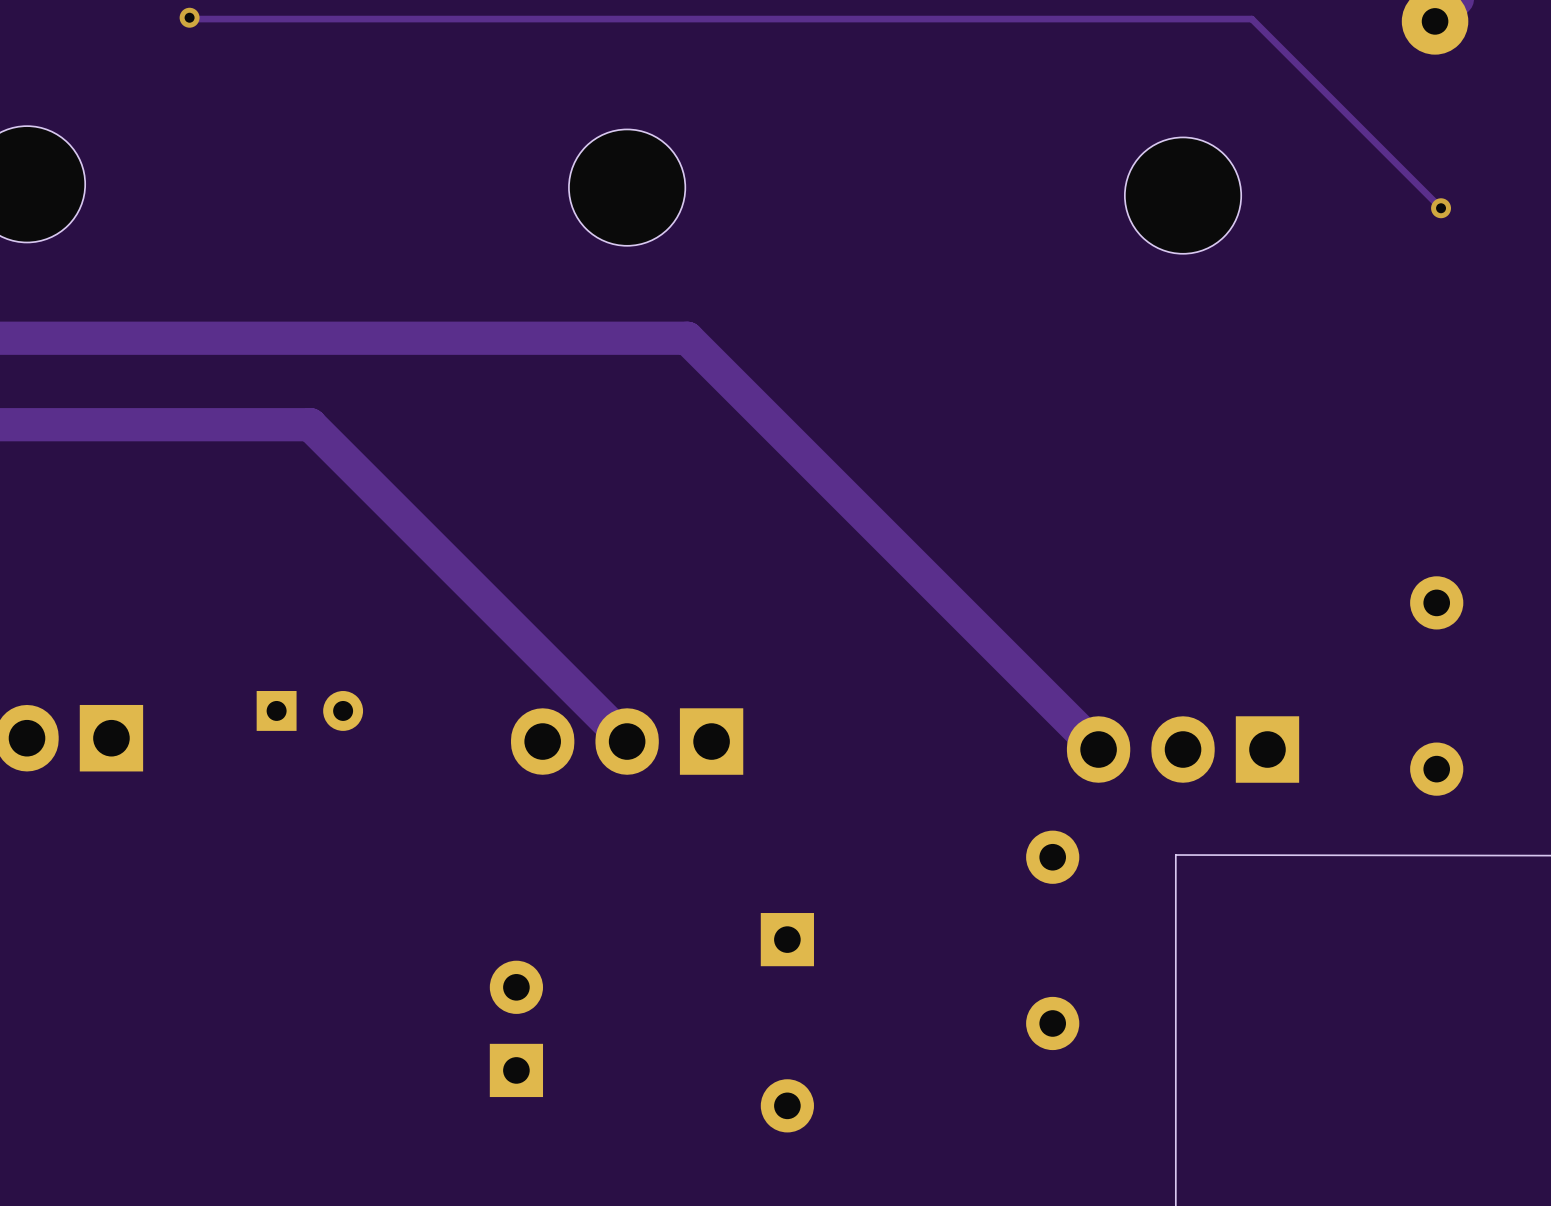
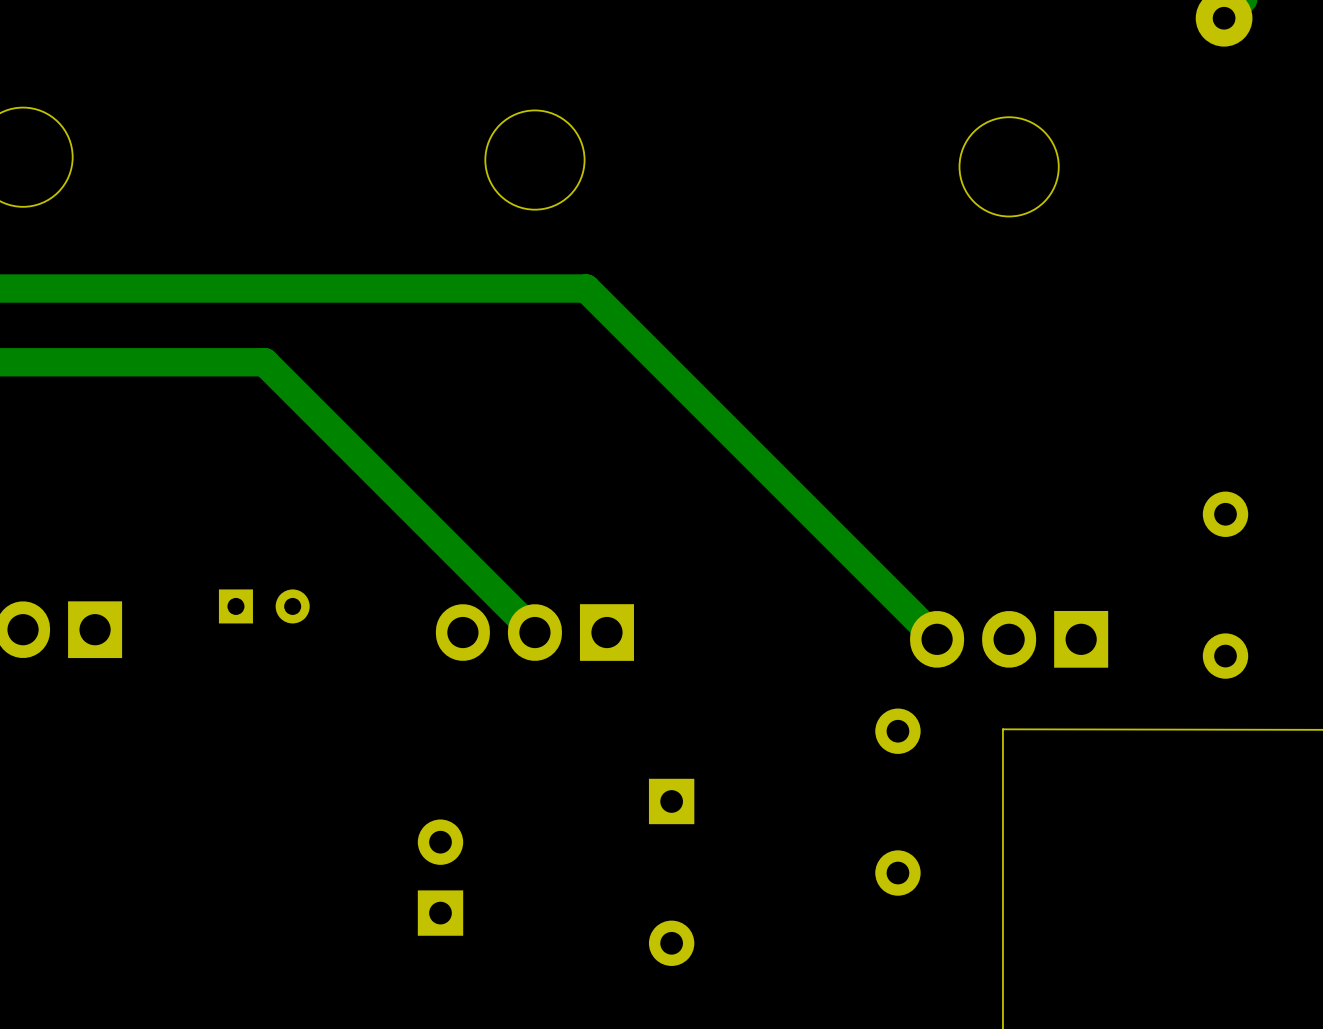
track: (189, 17) (1251, 19) (1441, 208) -> none
via: (189, 17) -> none
via: (1441, 208) -> none

